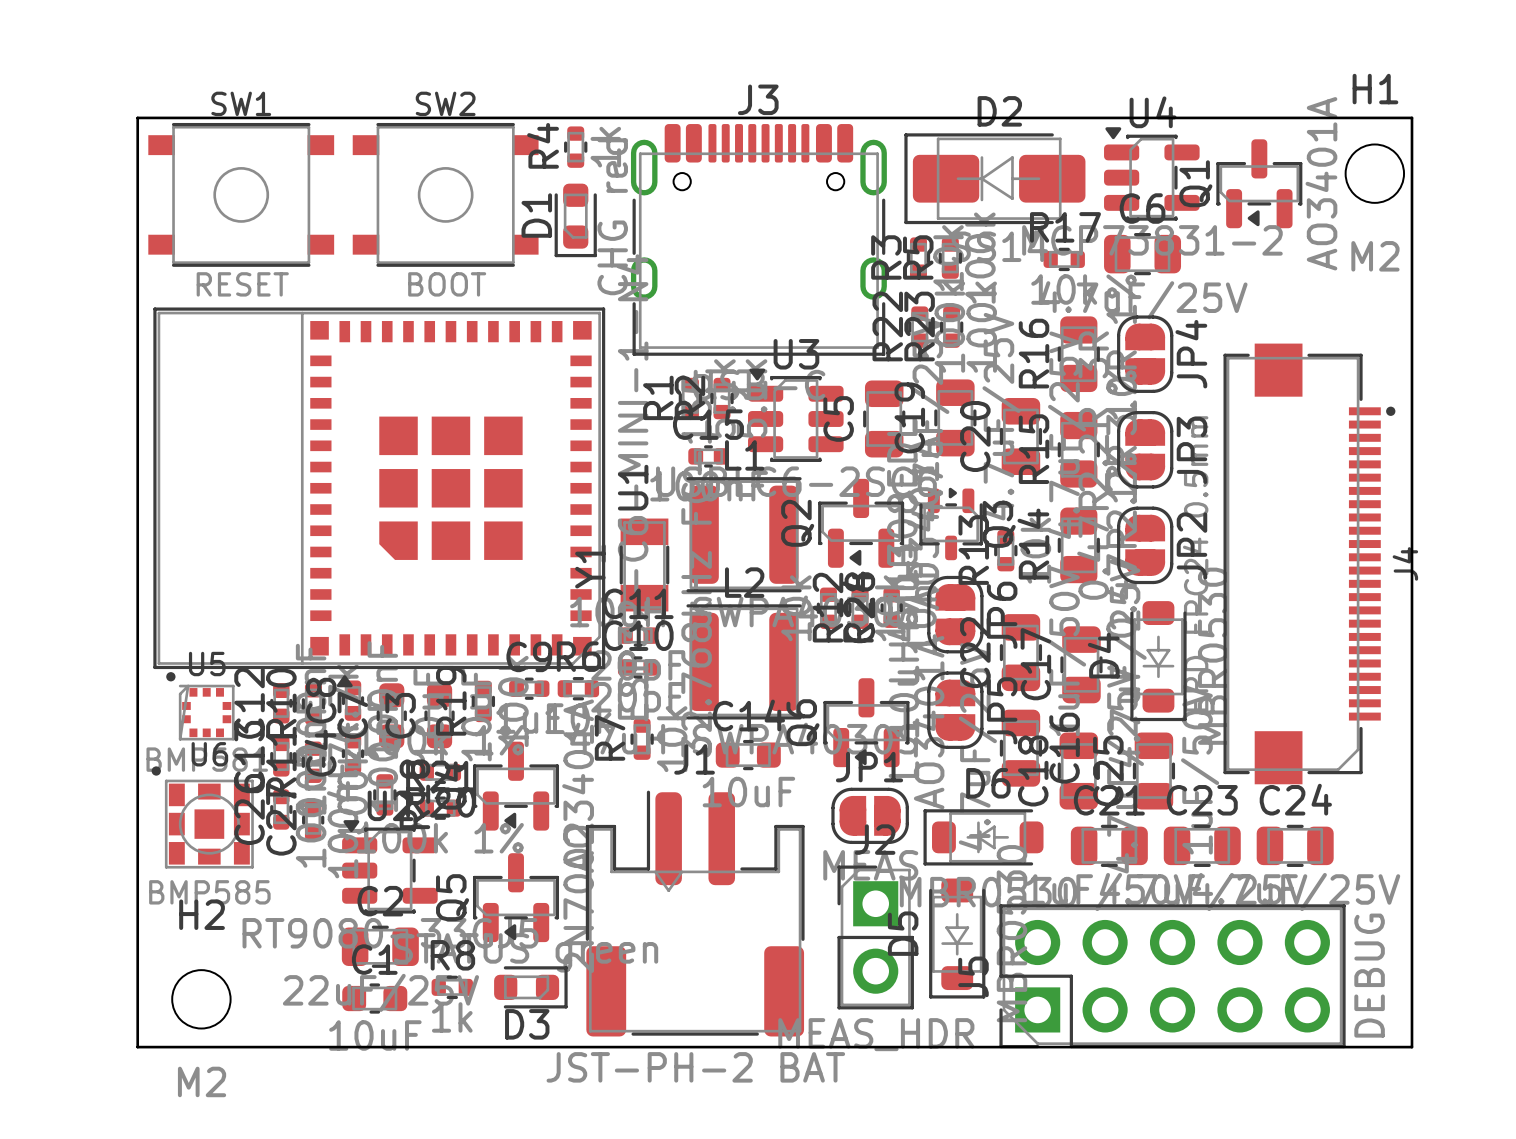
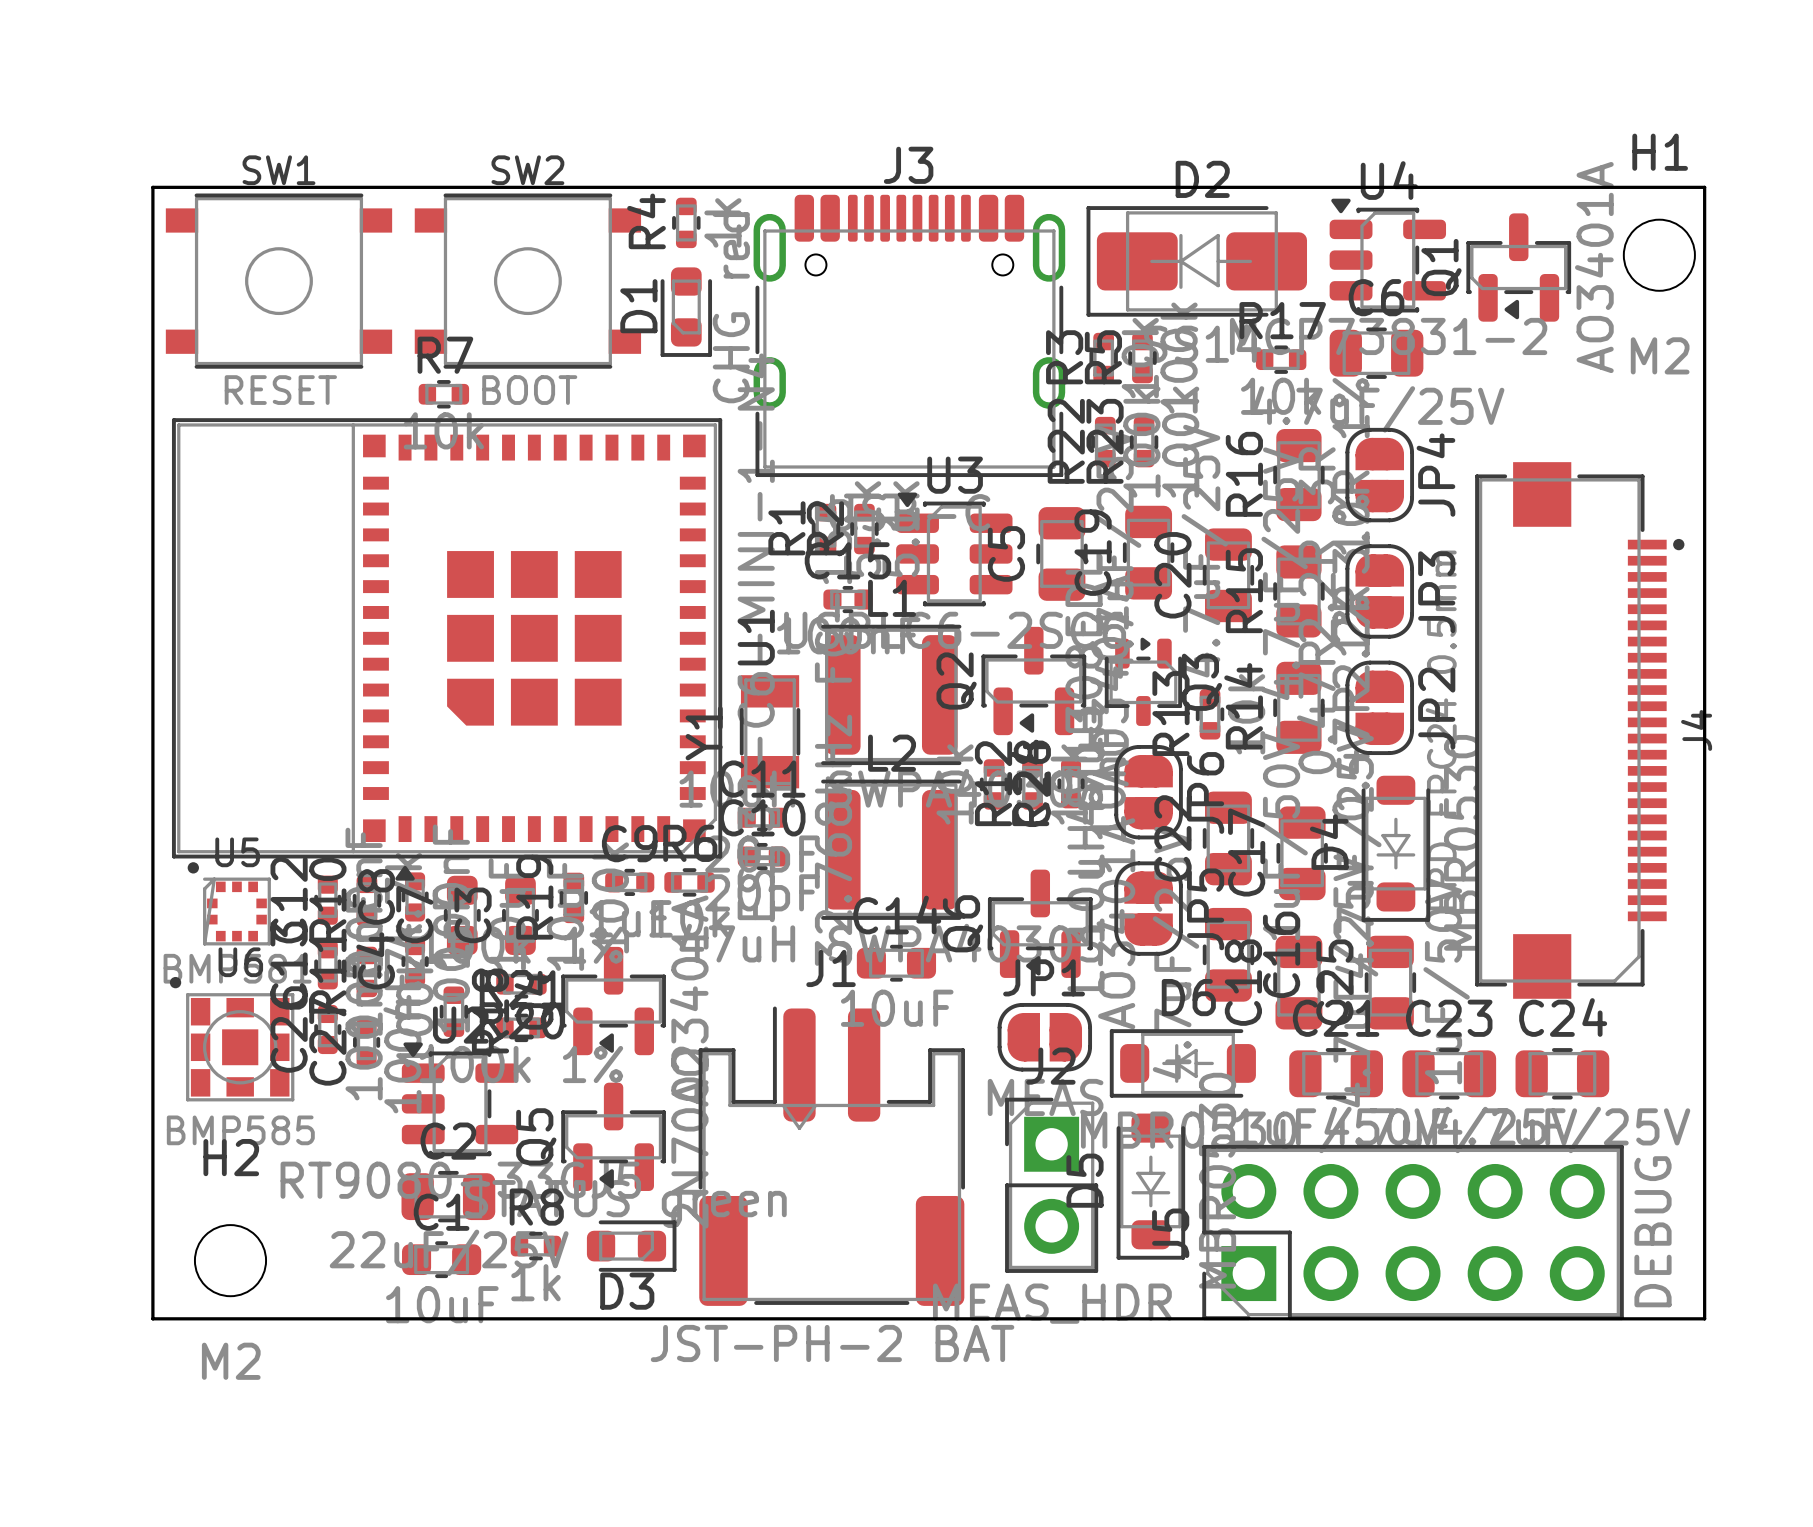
R7 rotation: 0° (642, 739) -> 90° clockwise (443, 394)
R7 position: (642, 739) -> (443, 394)

